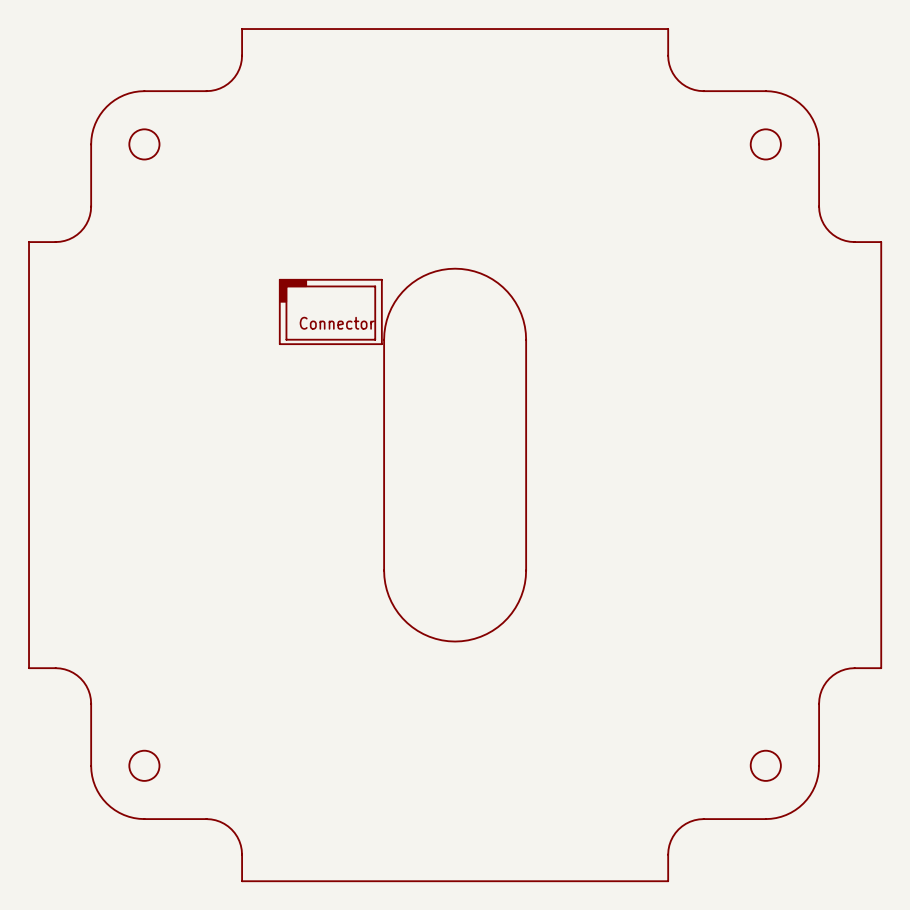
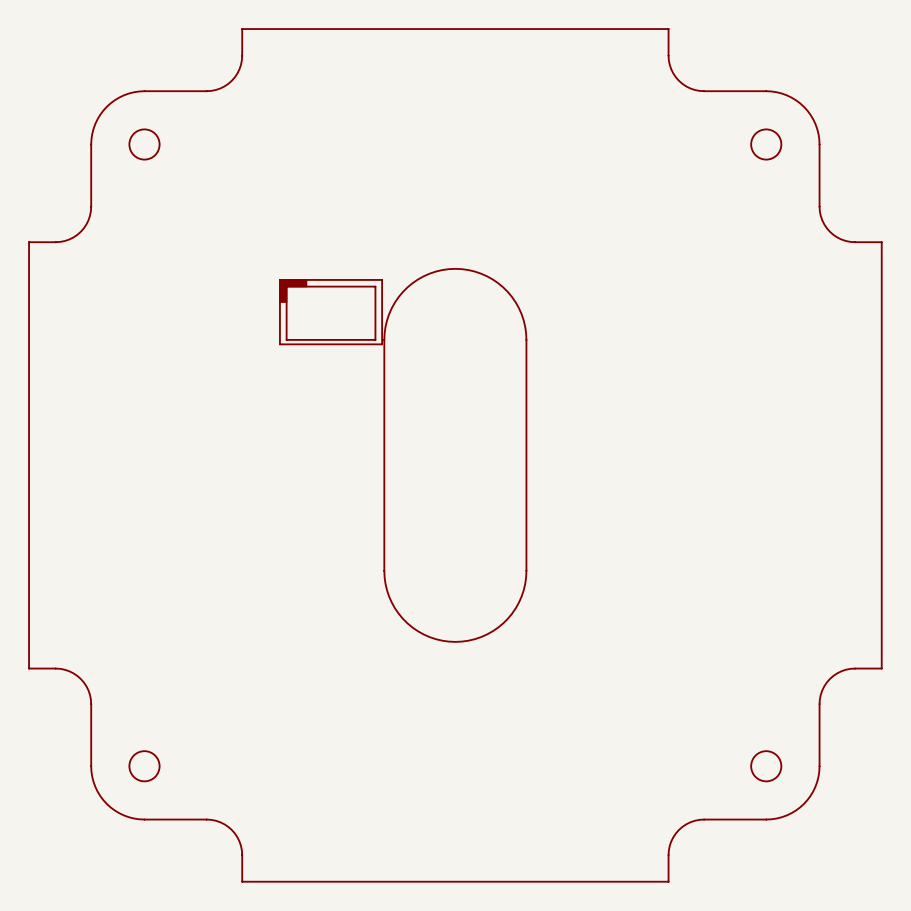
text: Connector (337, 323) -> none

